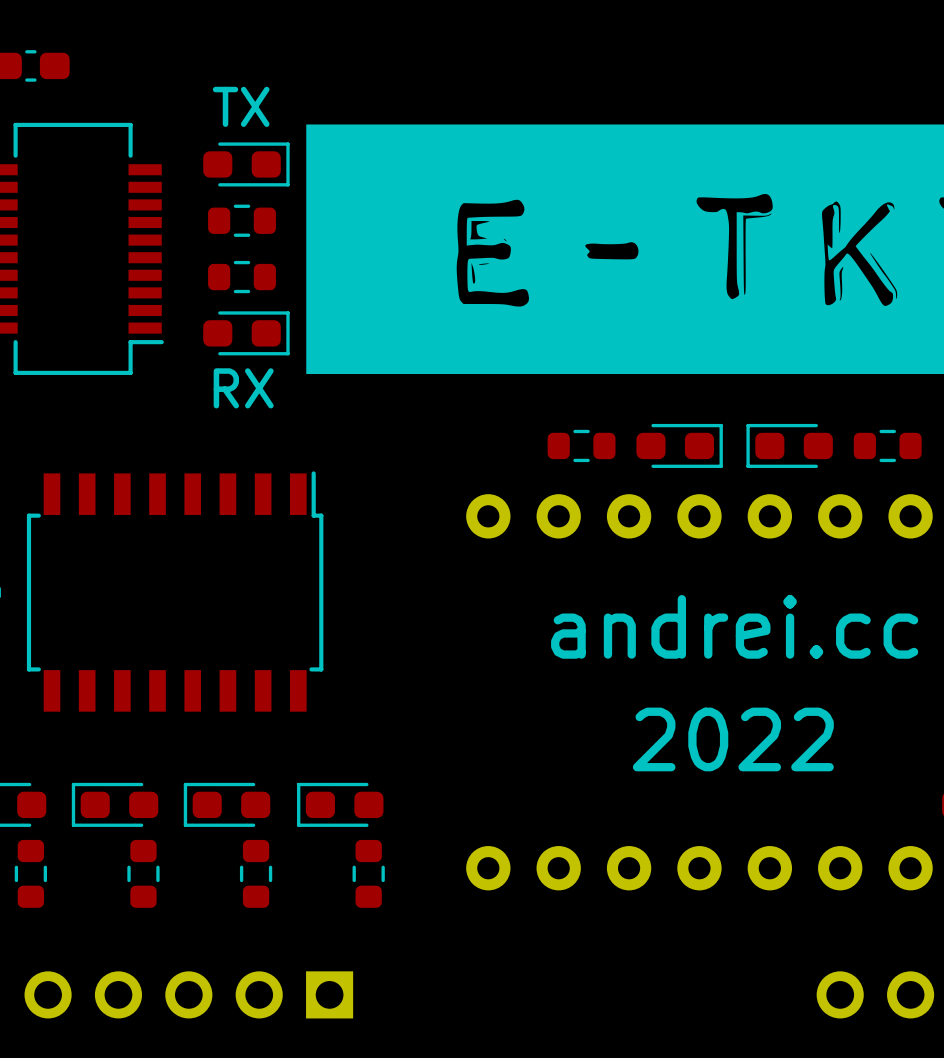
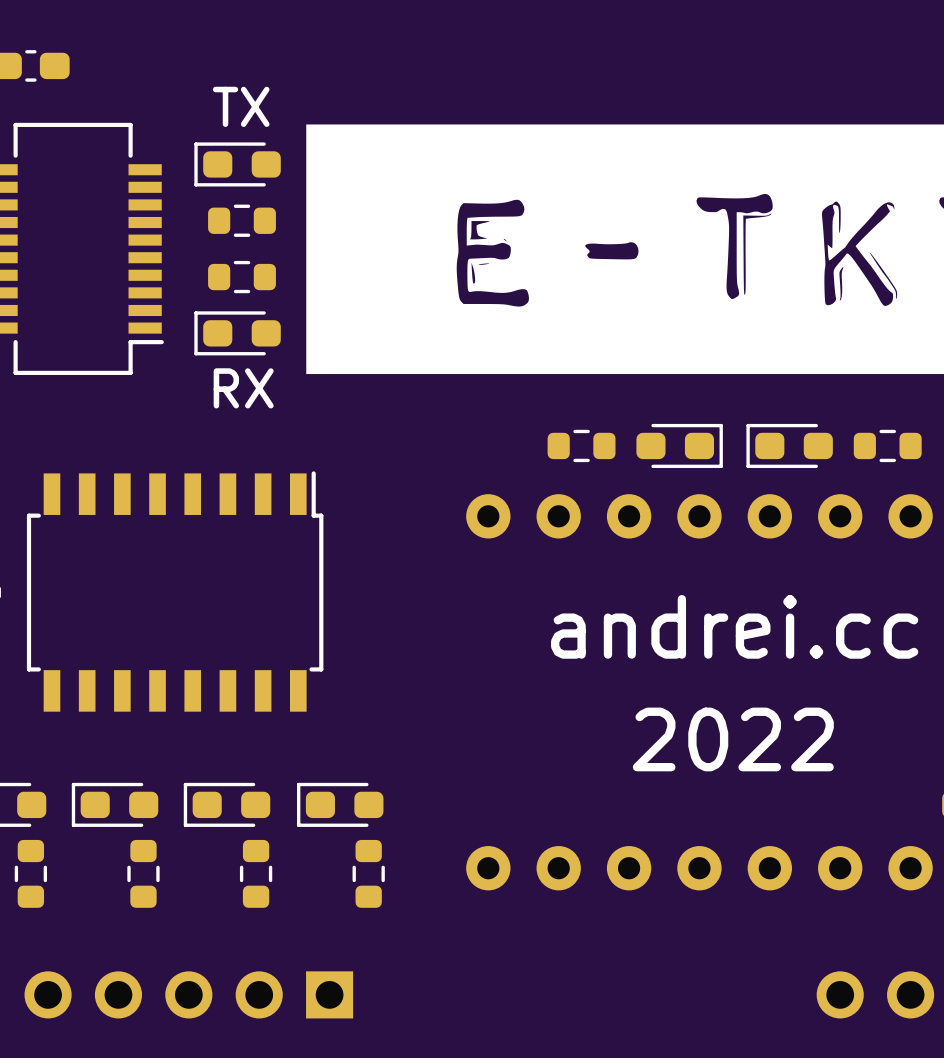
part rotation: 0° (246, 164) -> 180° (237, 164)
part rotation: 0° (246, 333) -> 180° (237, 333)

